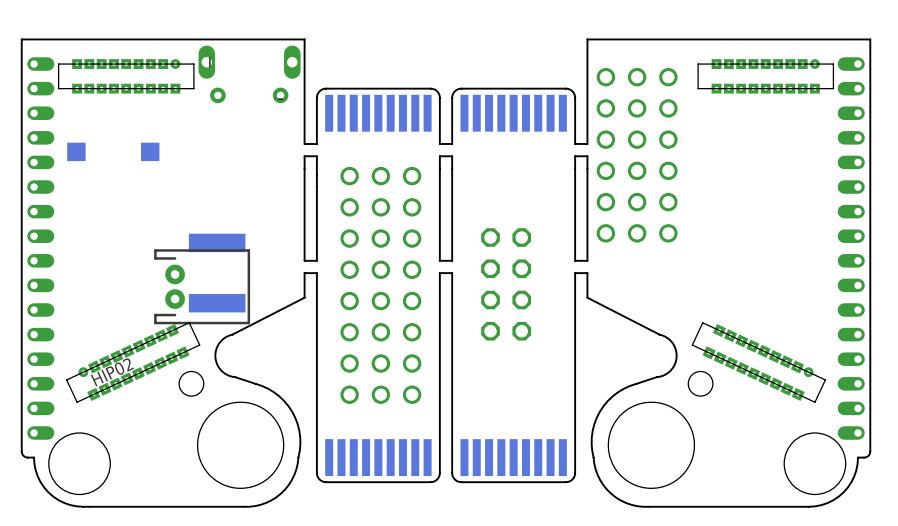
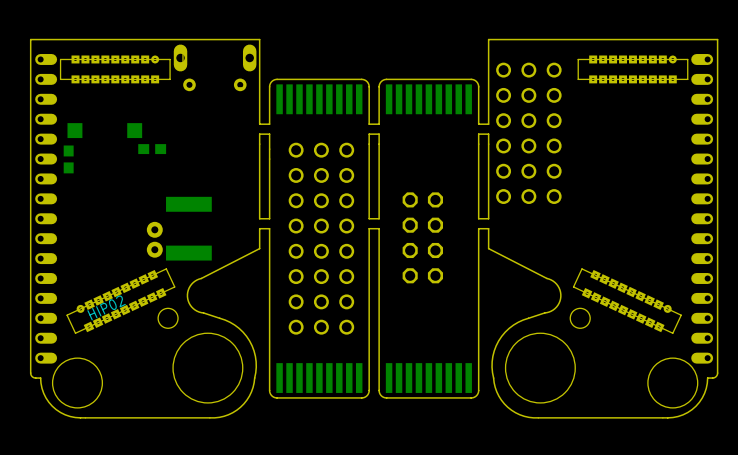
part: none -> (152, 149)
part: none -> (68, 159)
part: (202, 286) -> none

